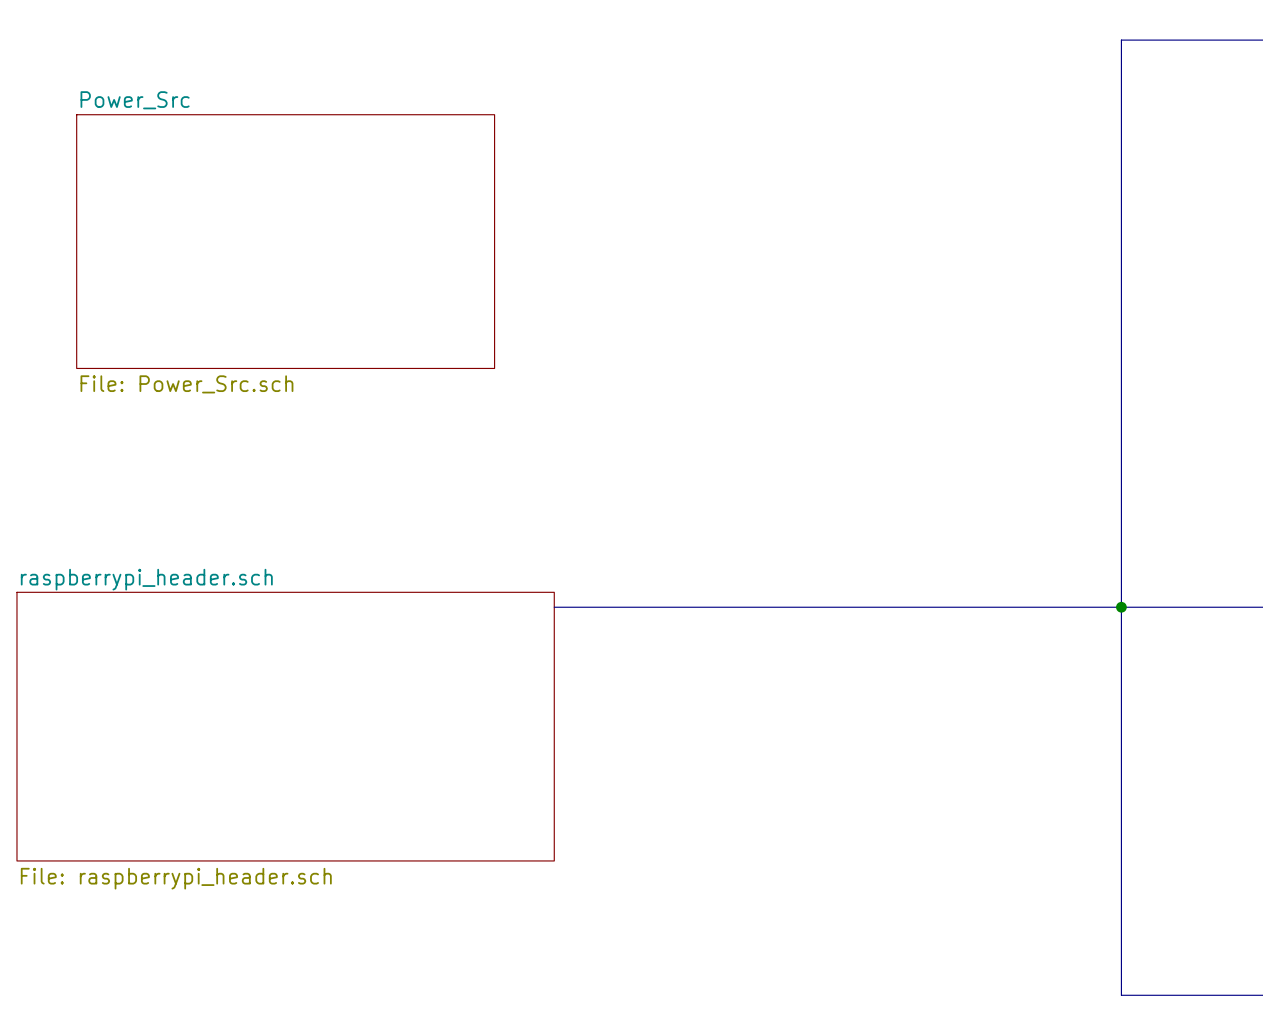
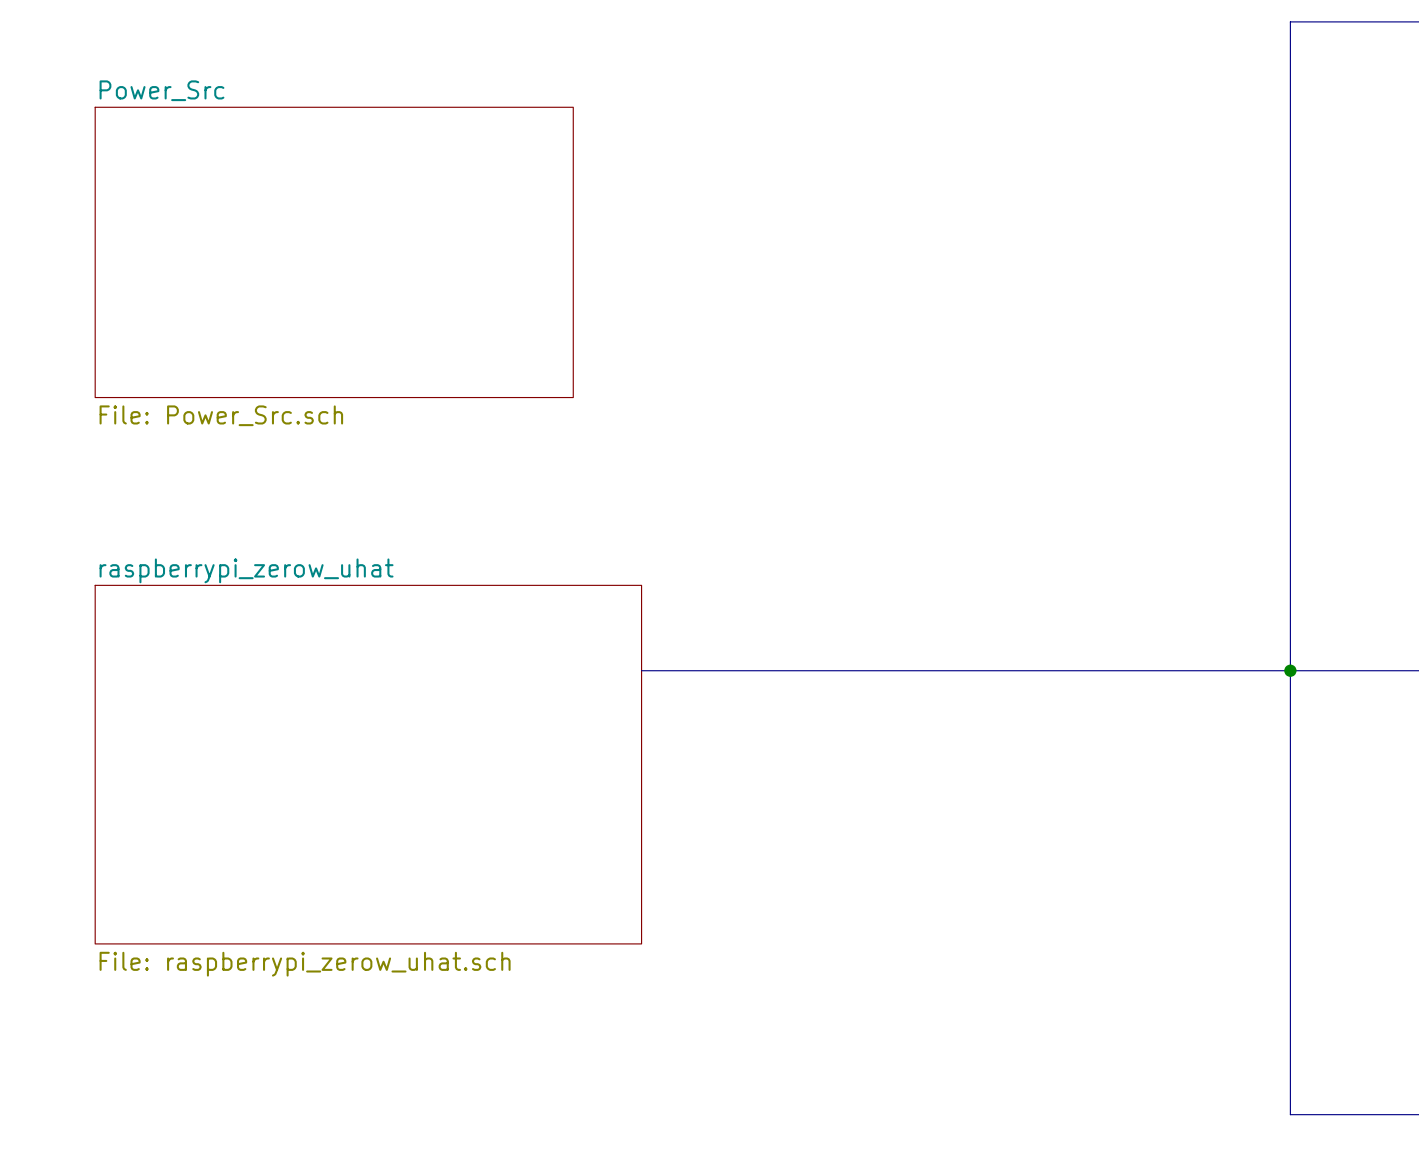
sheet raspberrypi_zerow_uhat: none -> File: raspberrypi_zerow_uhat.sch (368, 764)
sheet raspberrypi_header.sch: File: raspberrypi_header.sch (285, 726) -> none

